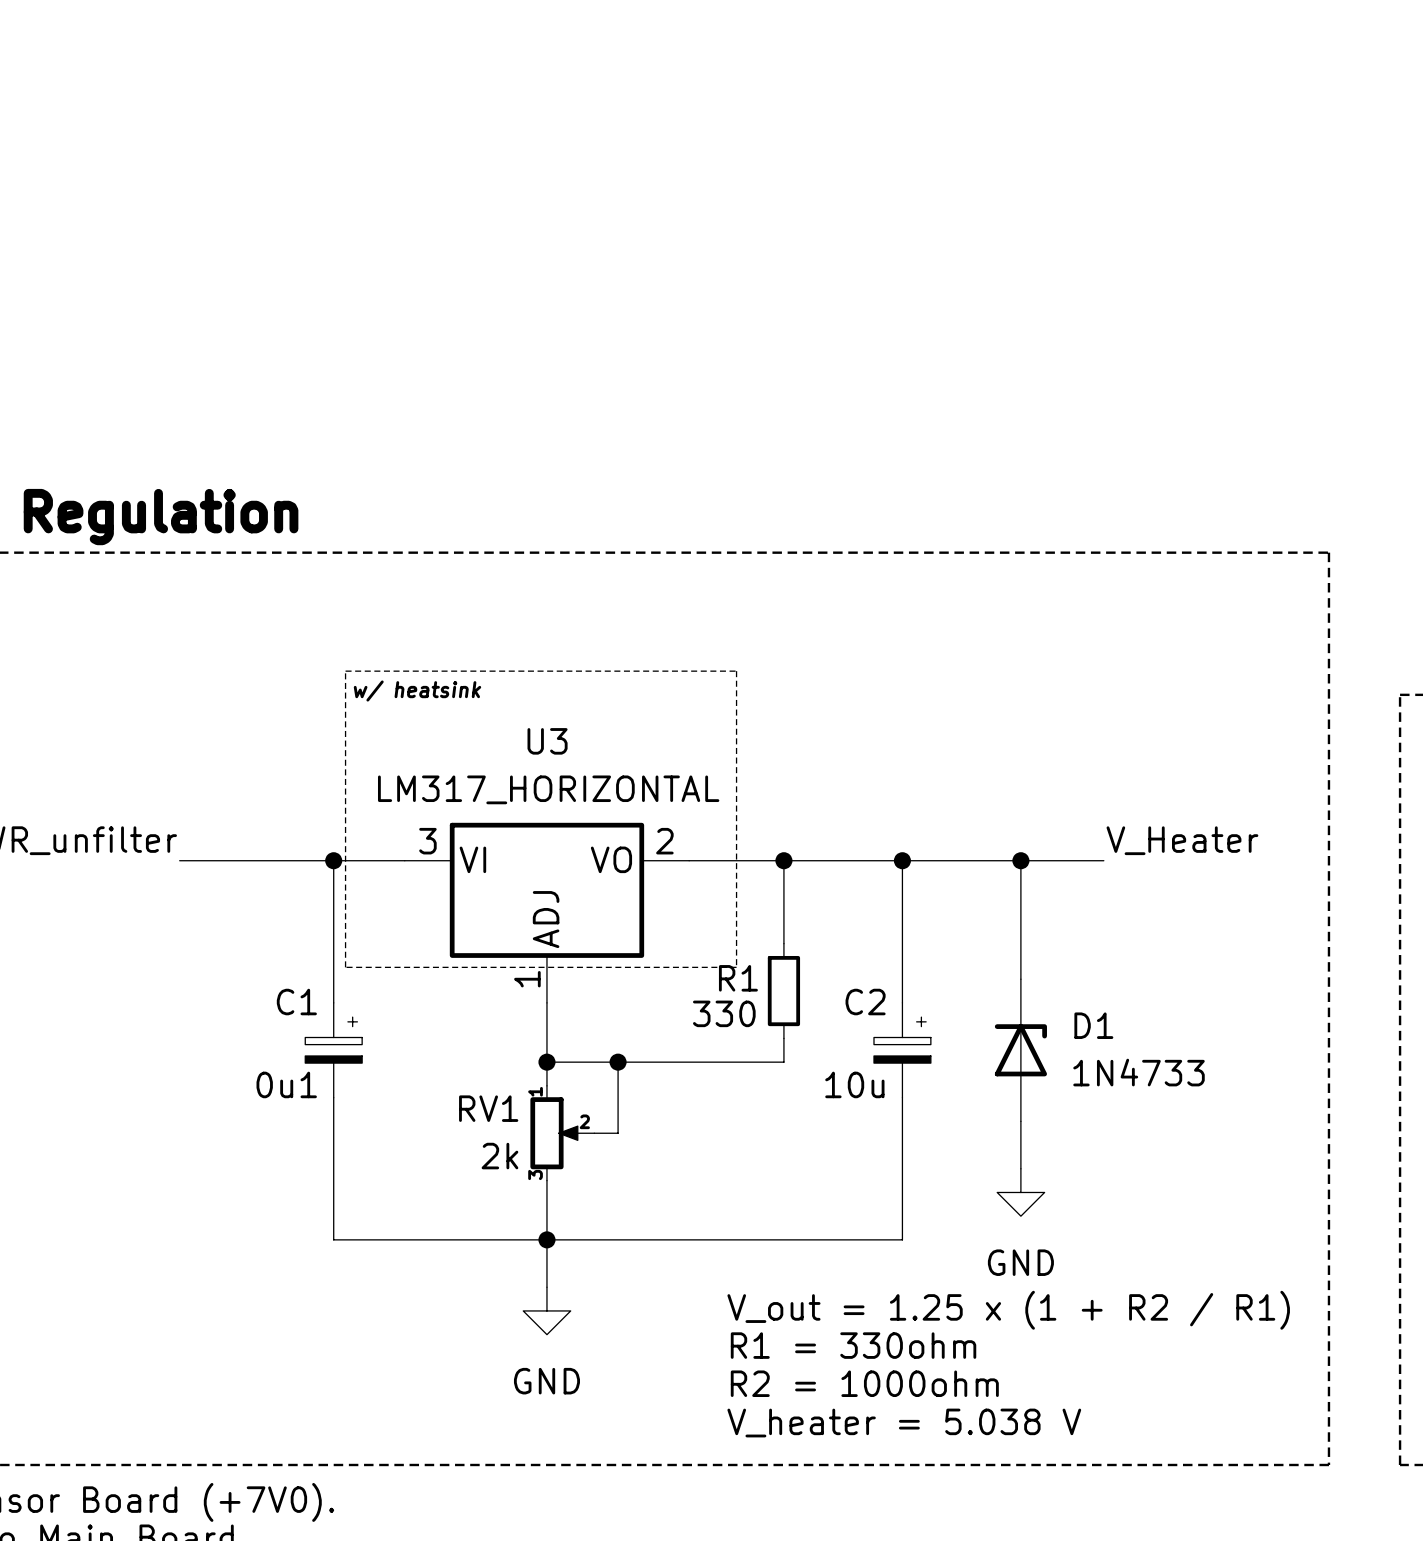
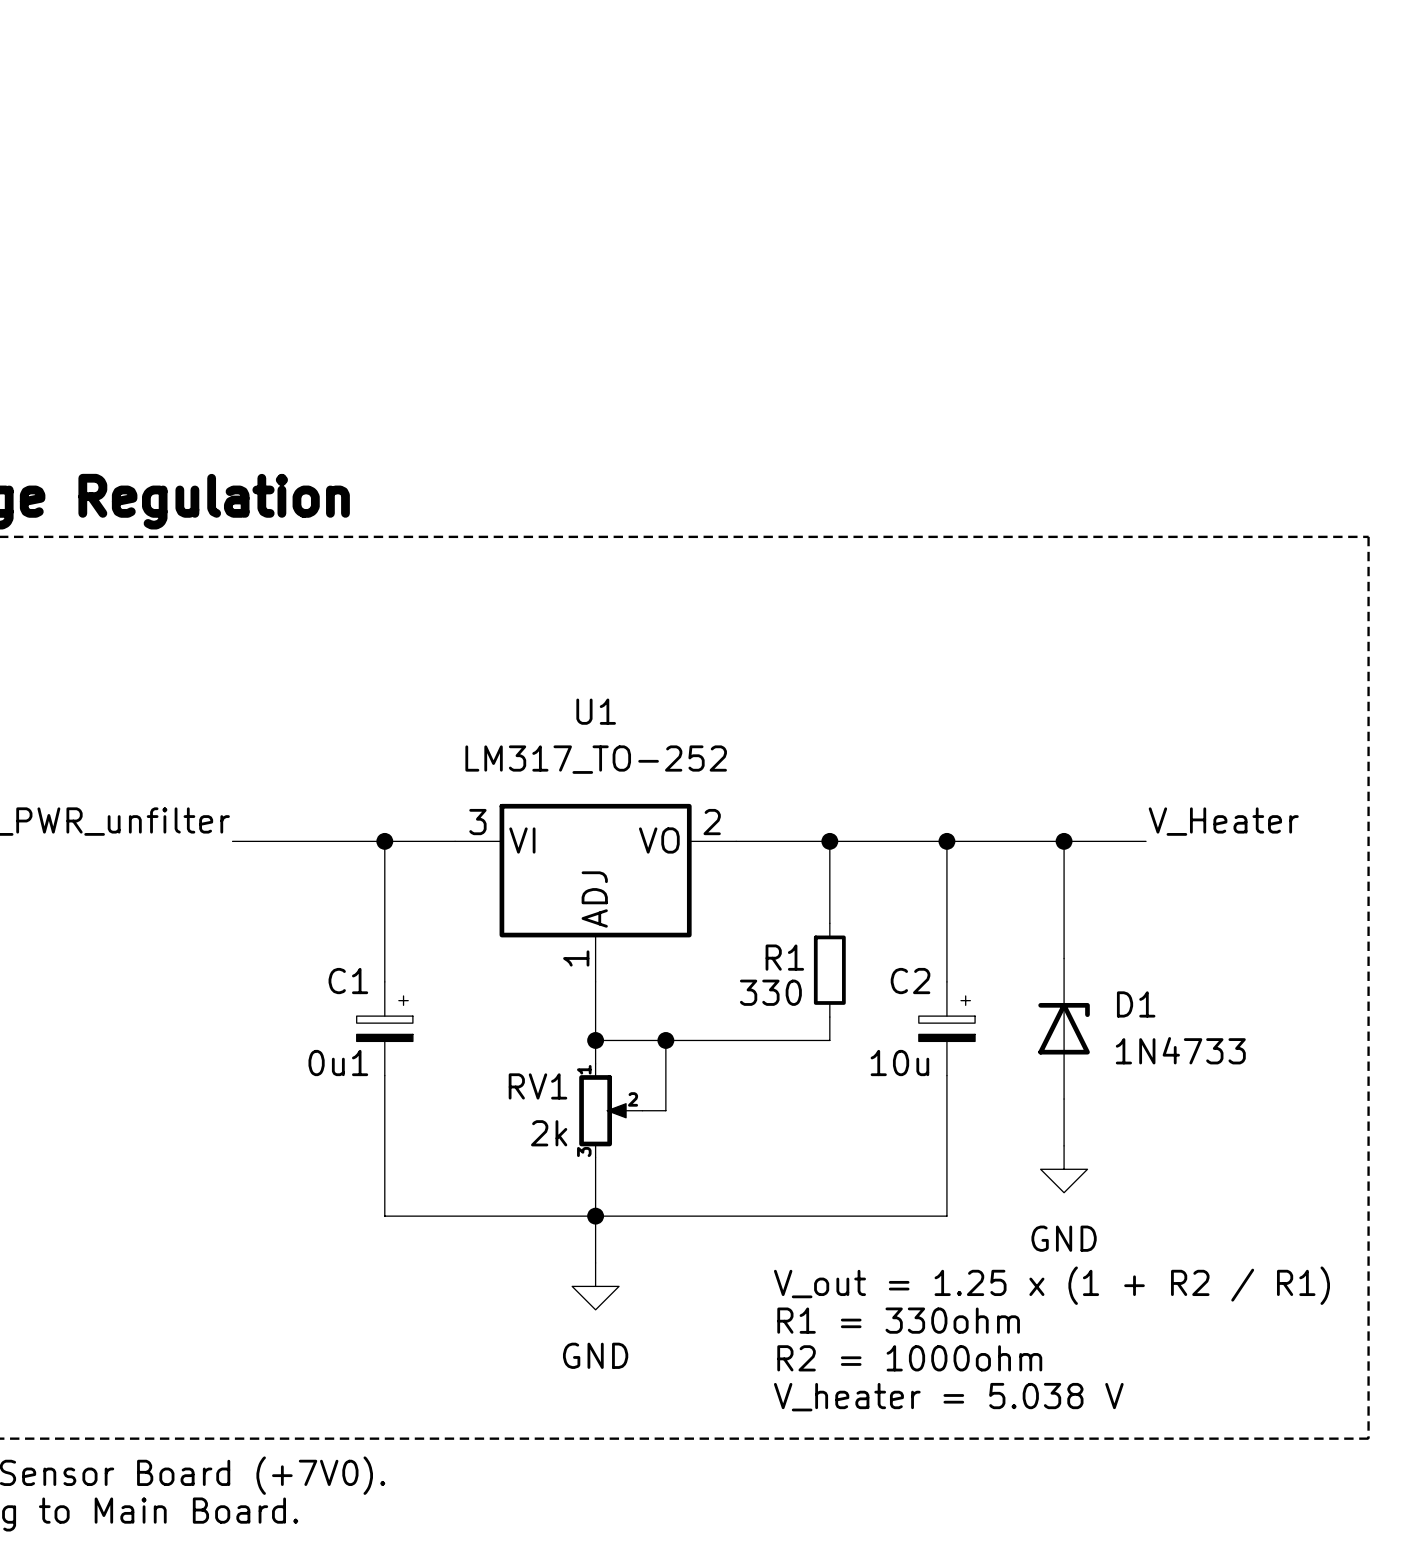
line: (345, 671) (736, 671) (736, 967) (345, 967) (345, 671) -> none
text: w/ heatsink (417, 691) -> none
U3 name: U3 (547, 741) -> U1 (596, 711)
U3 value: LM317_HORIZONTAL (548, 789) -> LM317_TO-252 (596, 759)

